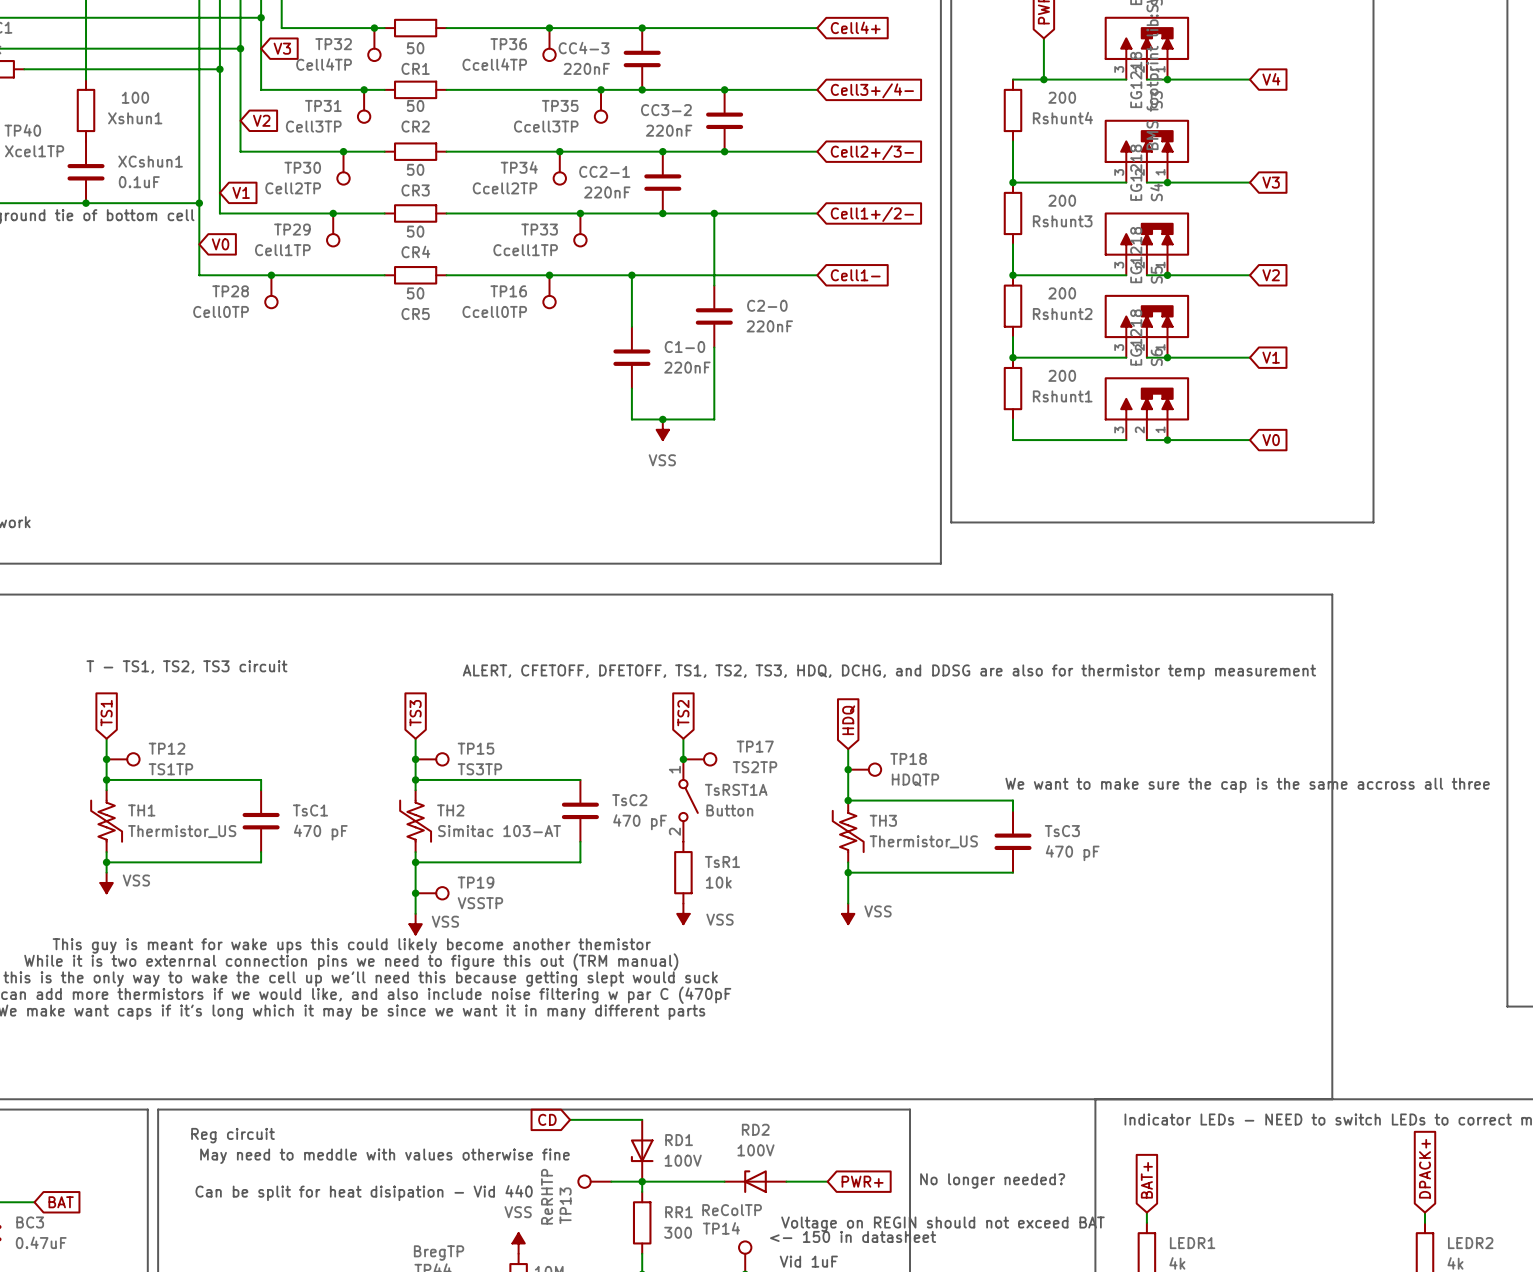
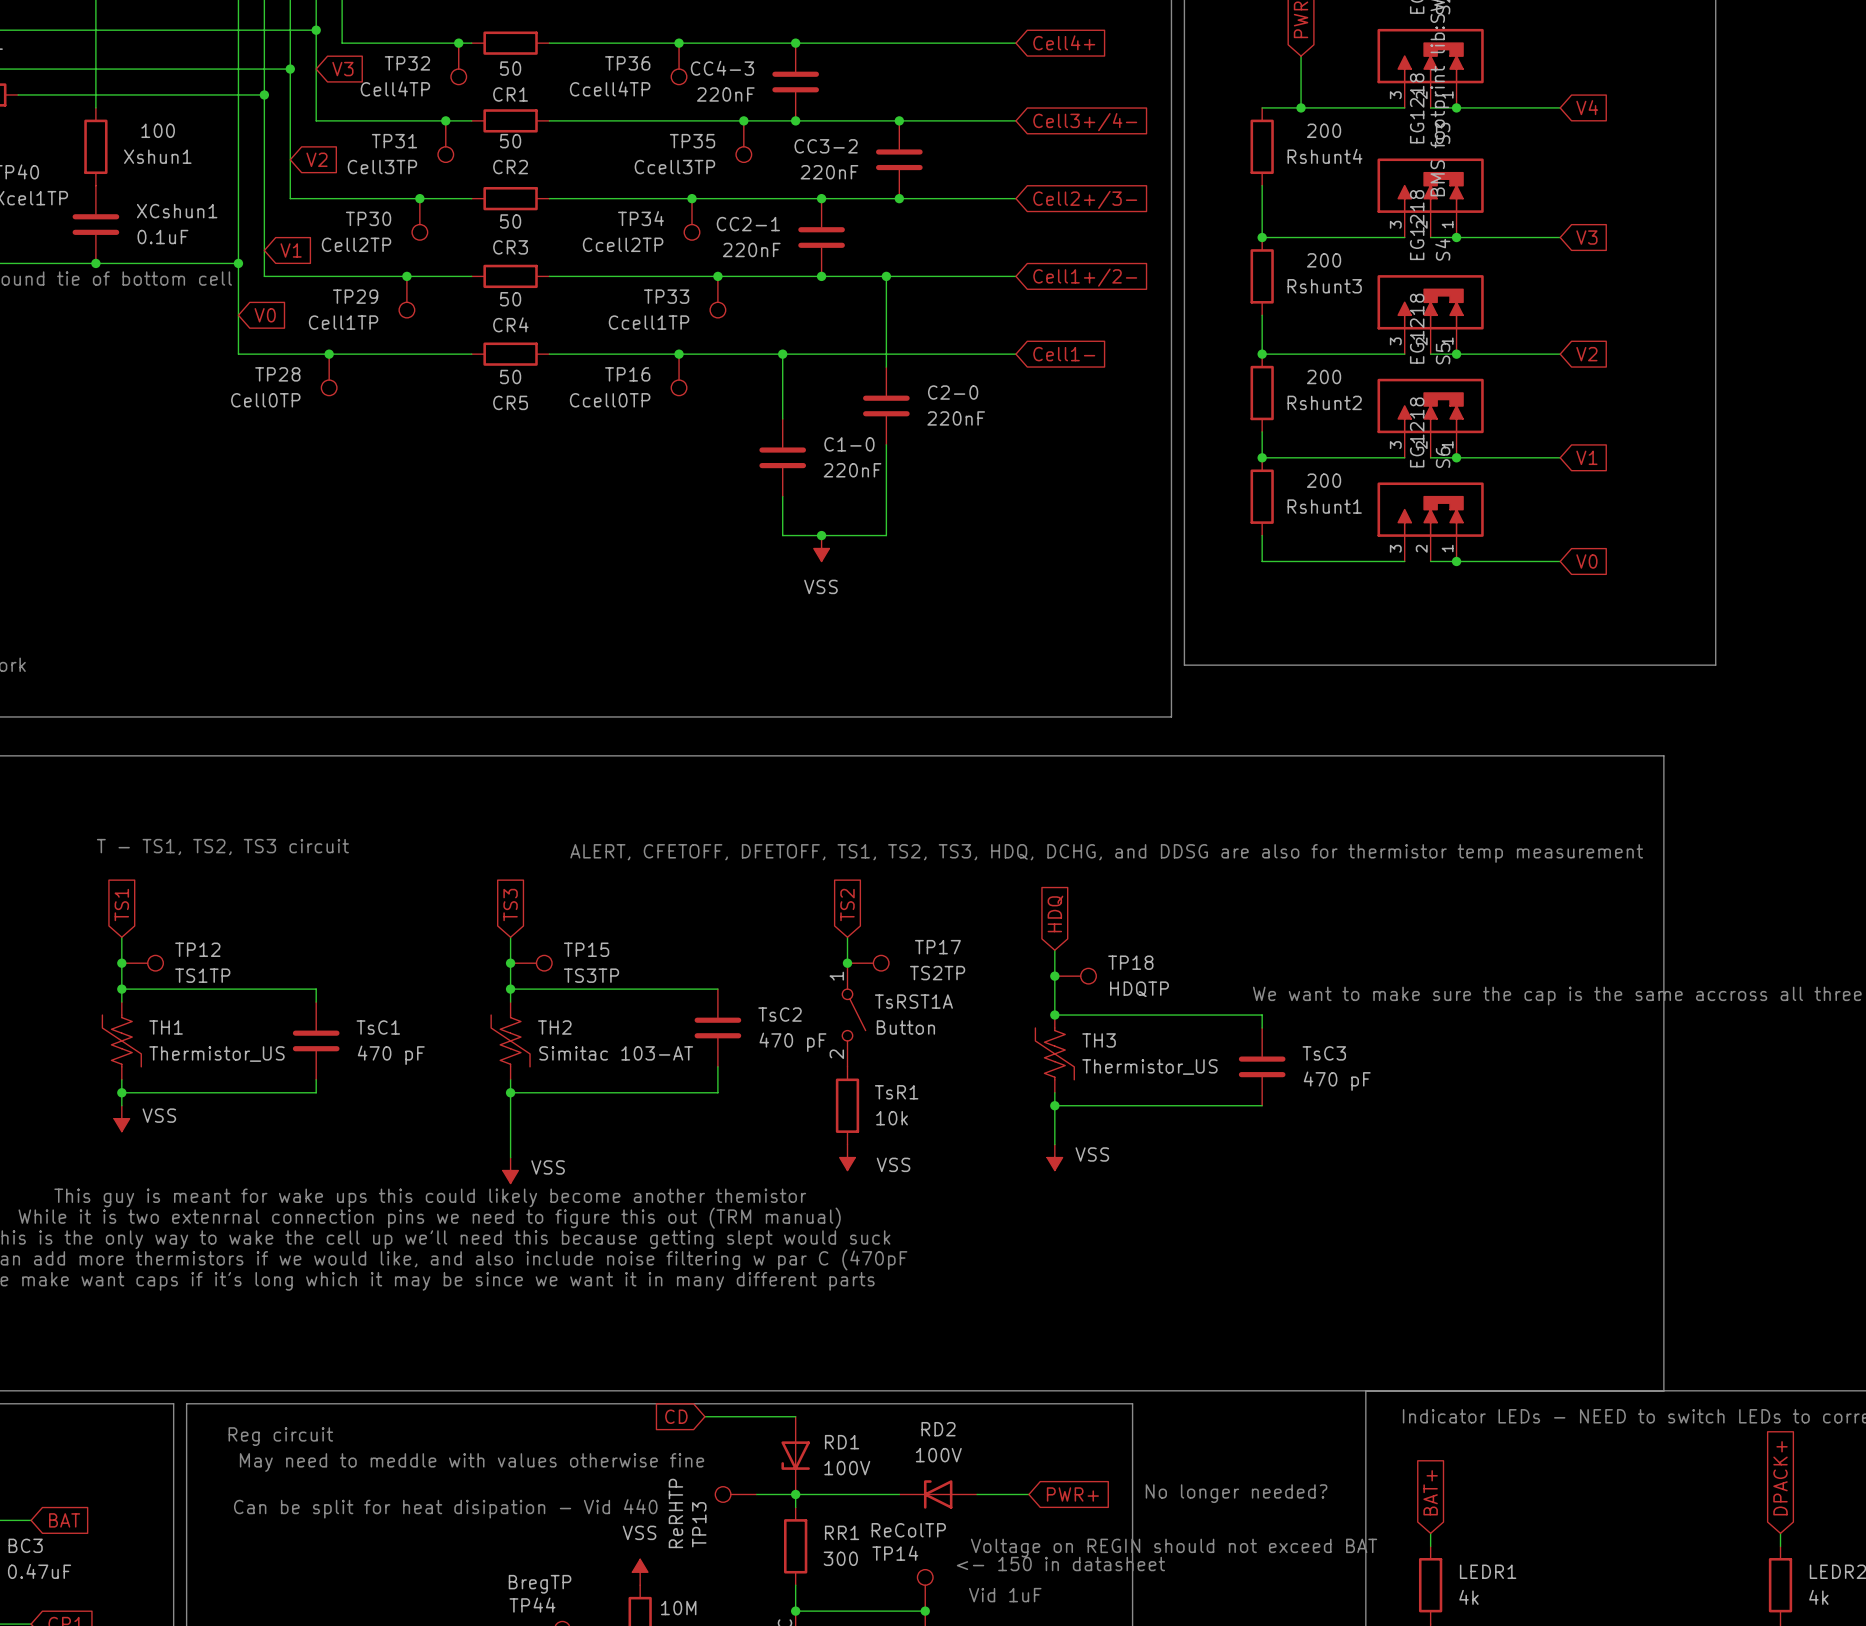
junction: (415, 893) -> none
TP19: VSSTP (432, 893) -> none

